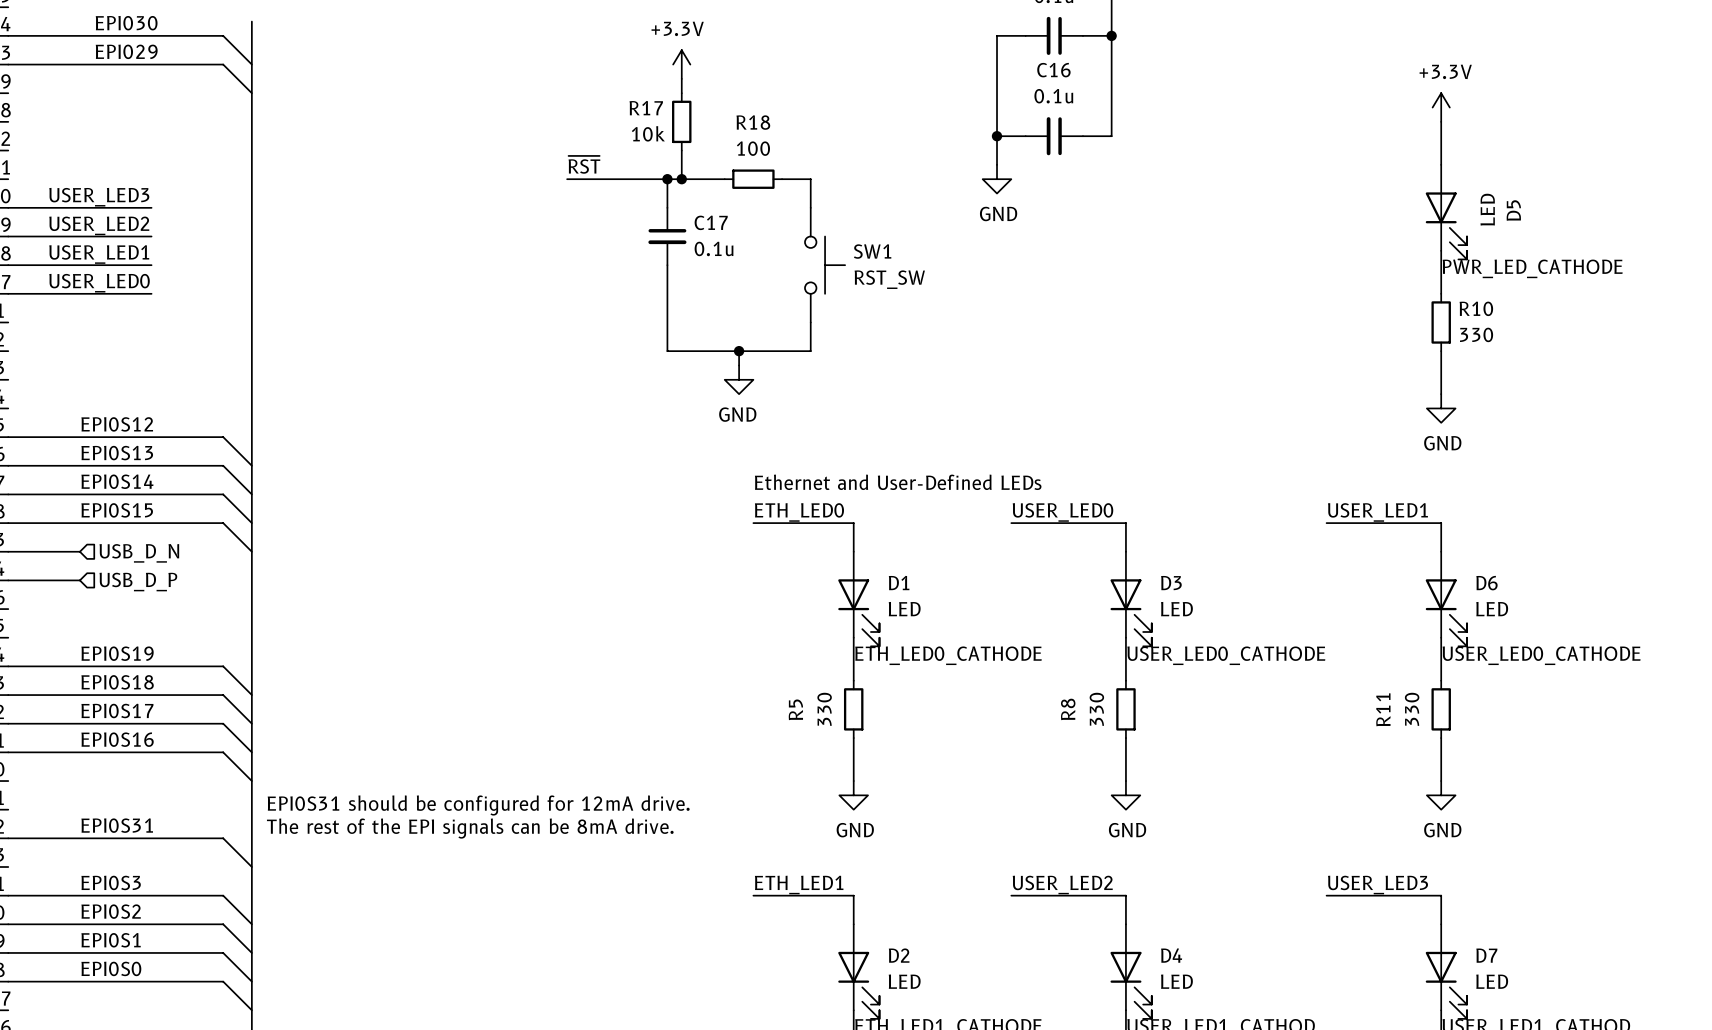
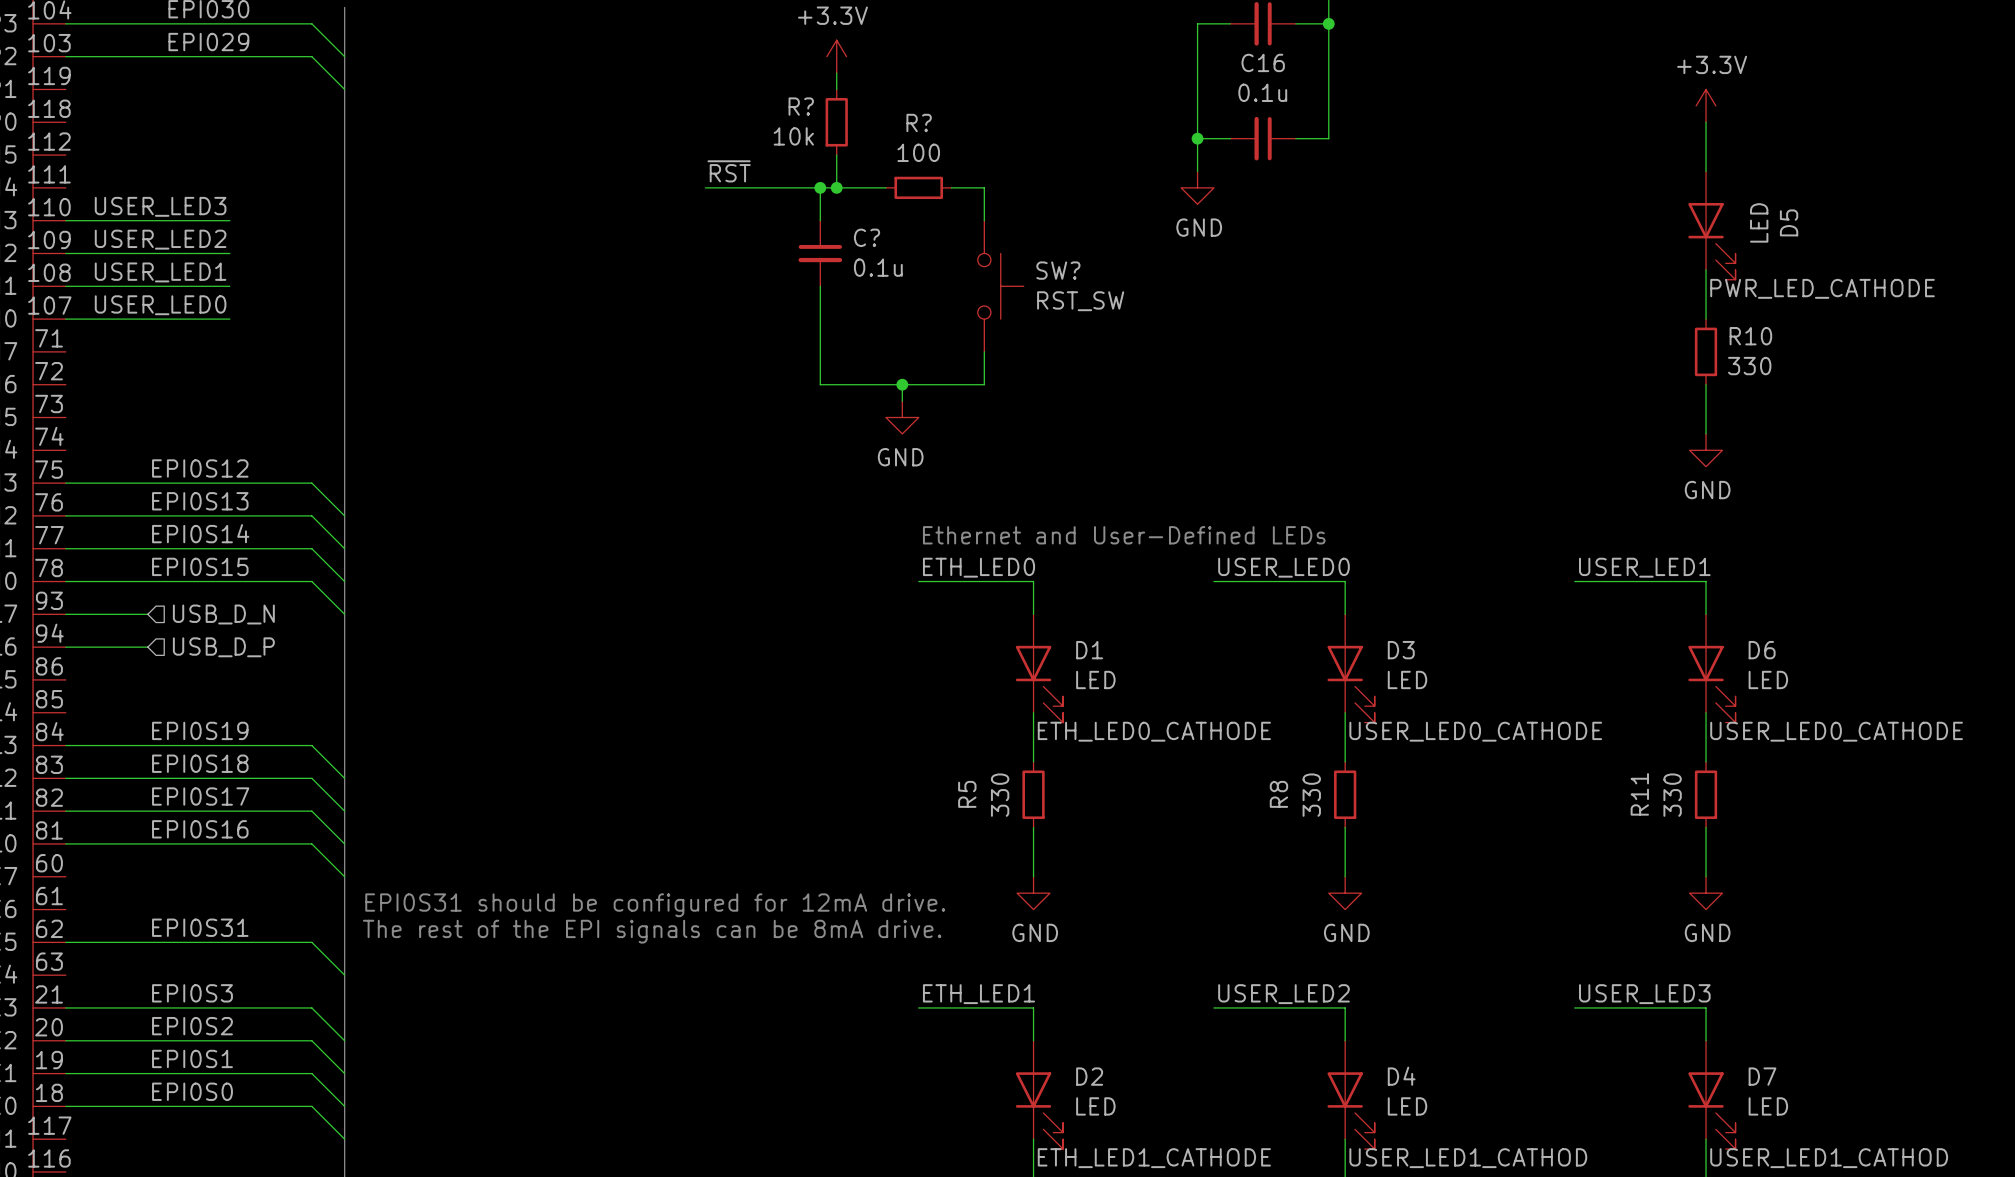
R17 name: R17 (646, 108) -> R? (801, 106)
R18 name: R18 (753, 122) -> R? (919, 122)
C17 name: C17 (711, 222) -> C? (867, 237)
SW1 name: SW1 (872, 251) -> SW? (1058, 270)

